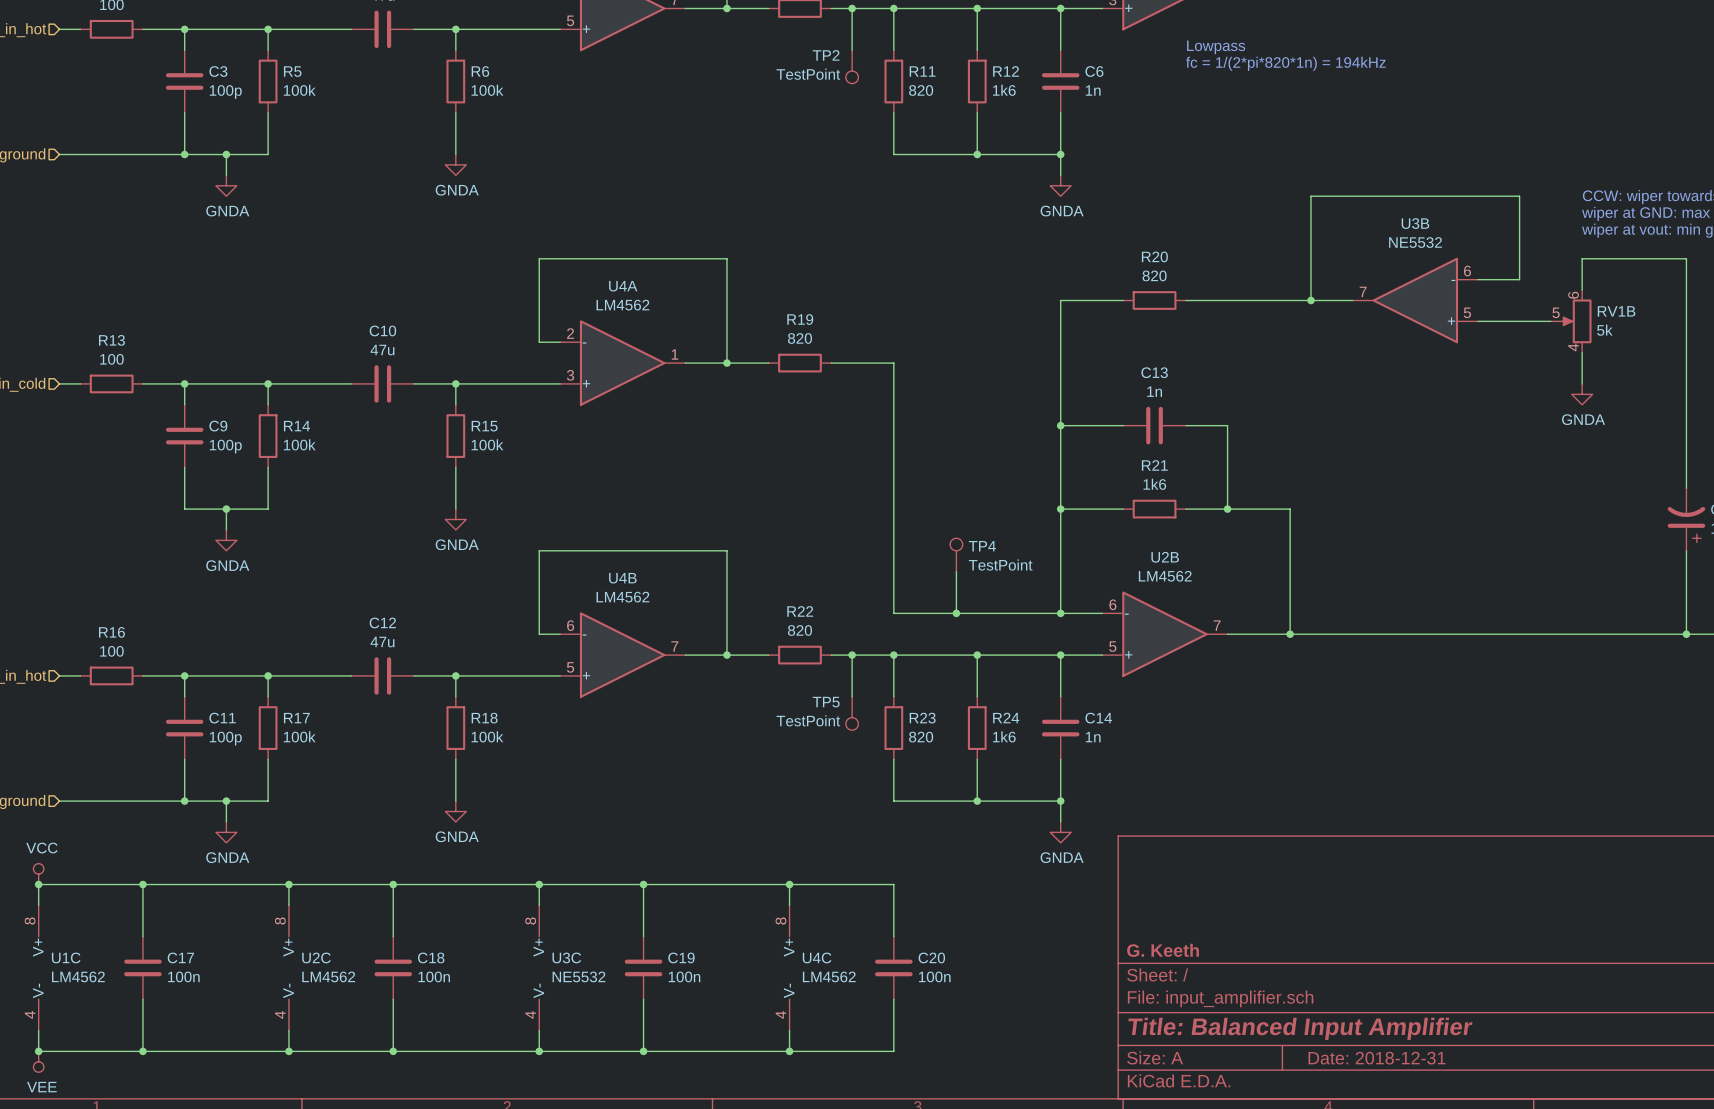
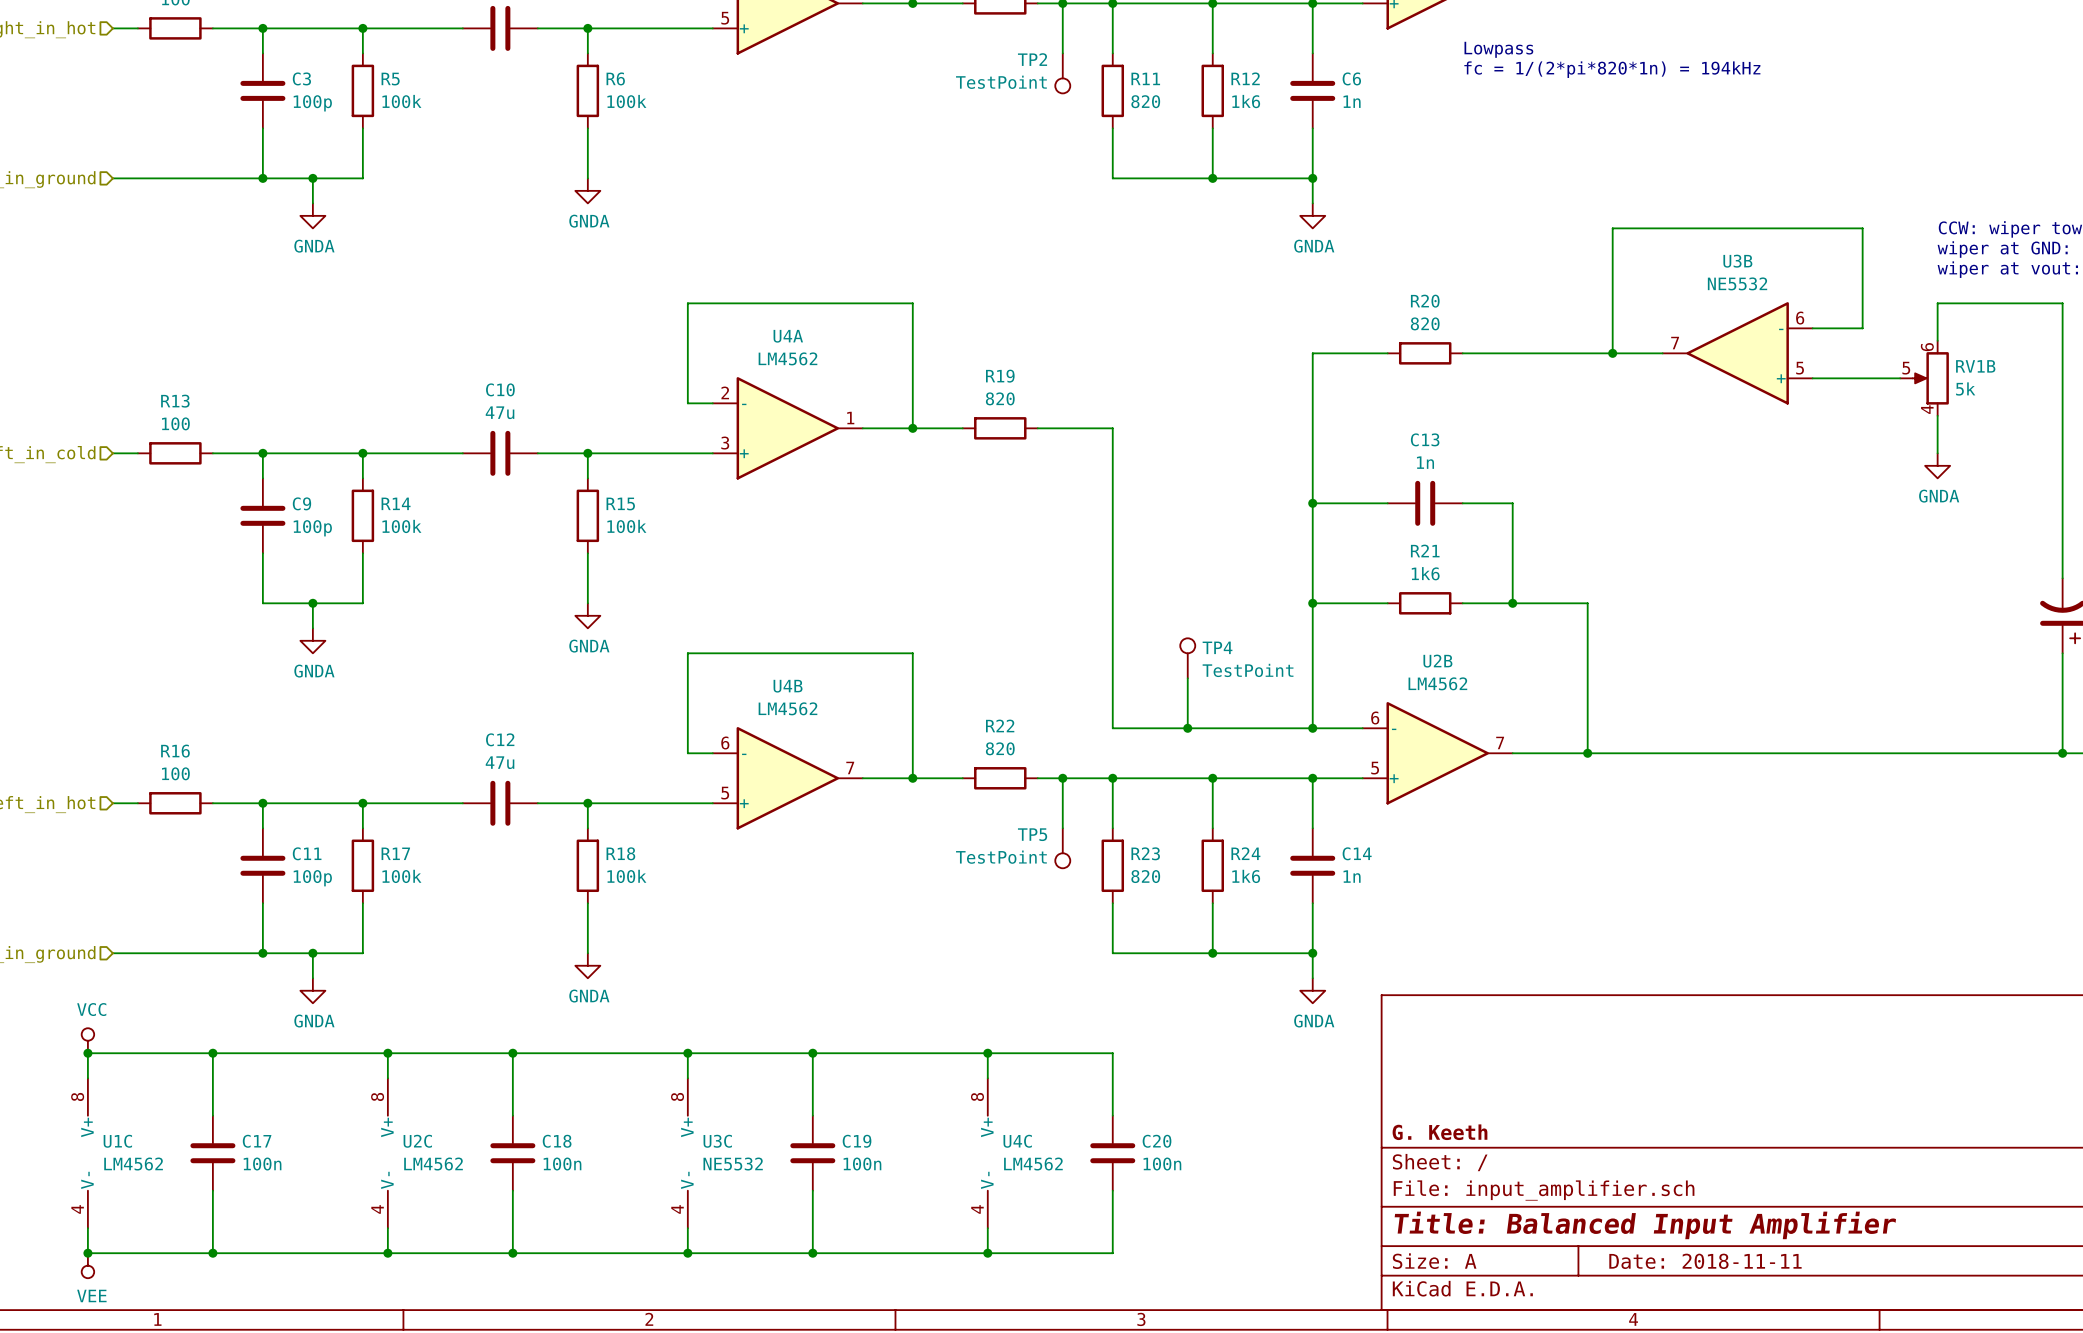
title block: Date: 2018-12-31 (1377, 1058) -> Date: 2018-11-11 (1705, 1261)

